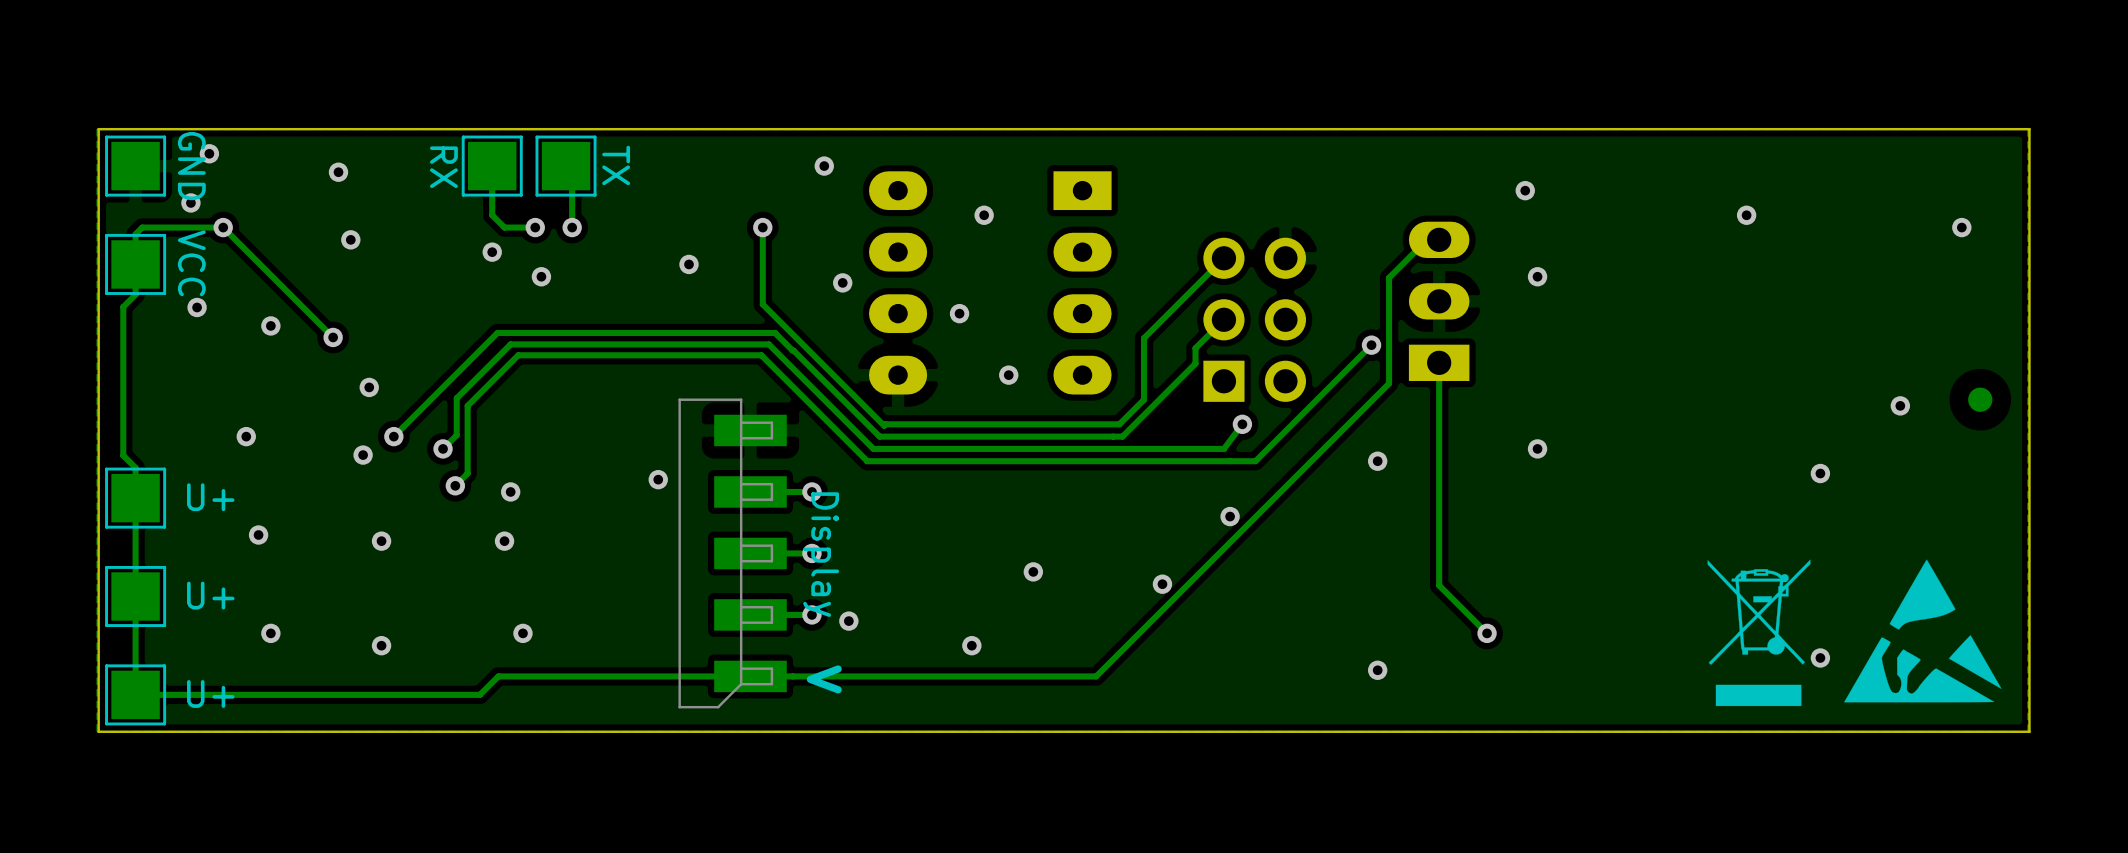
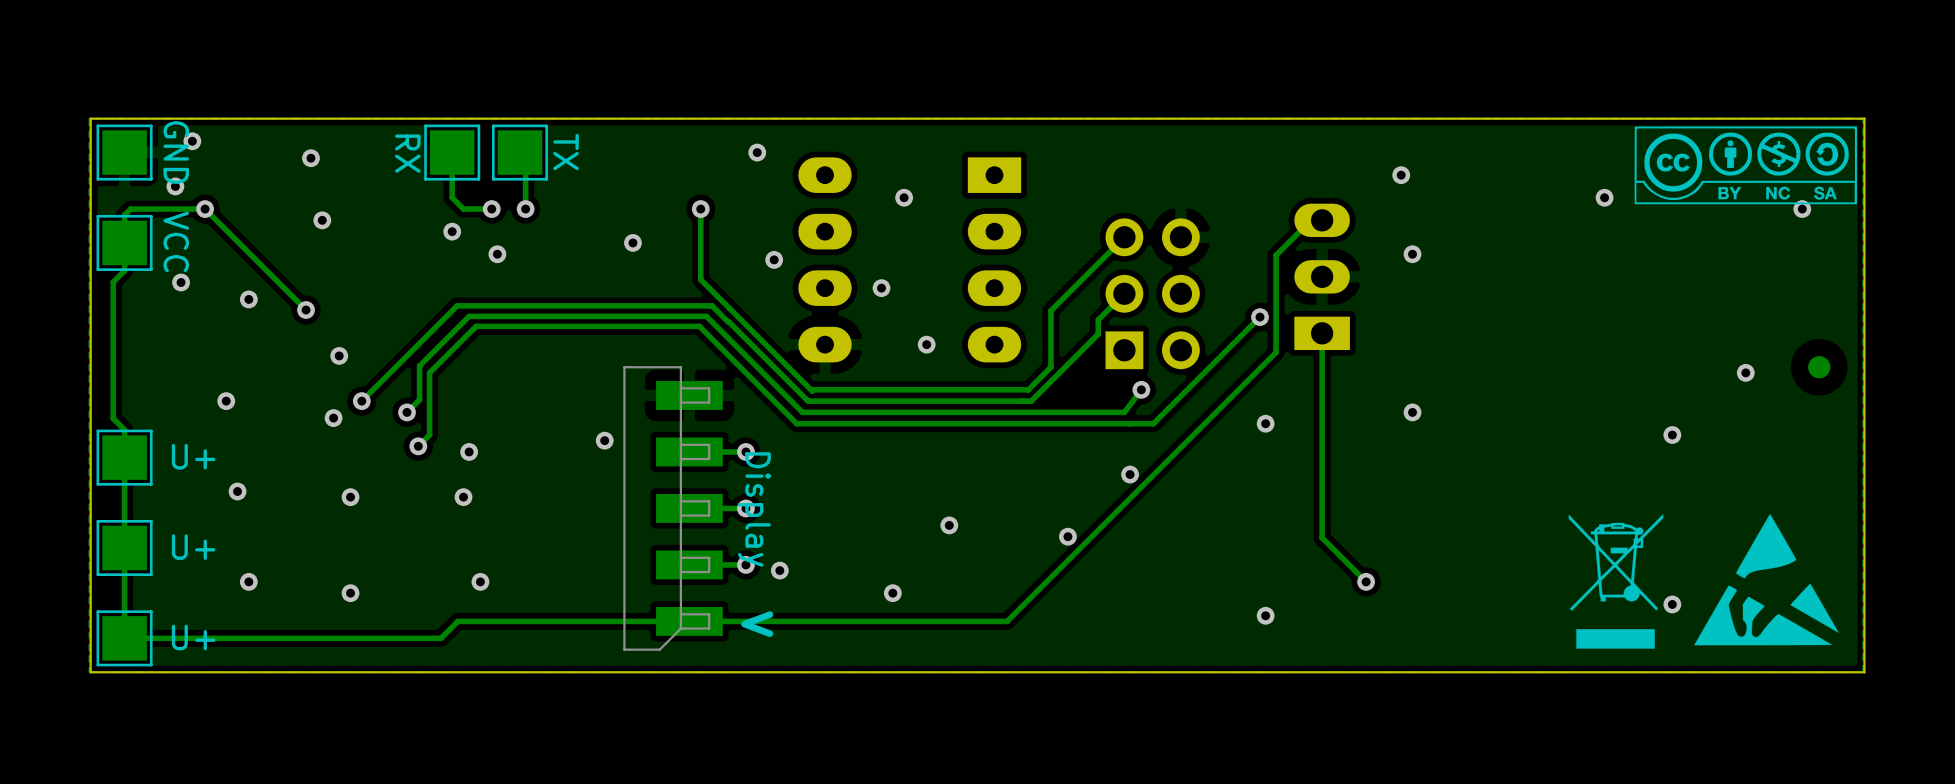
drawing: none -> [1634, 126, 1858, 205]

